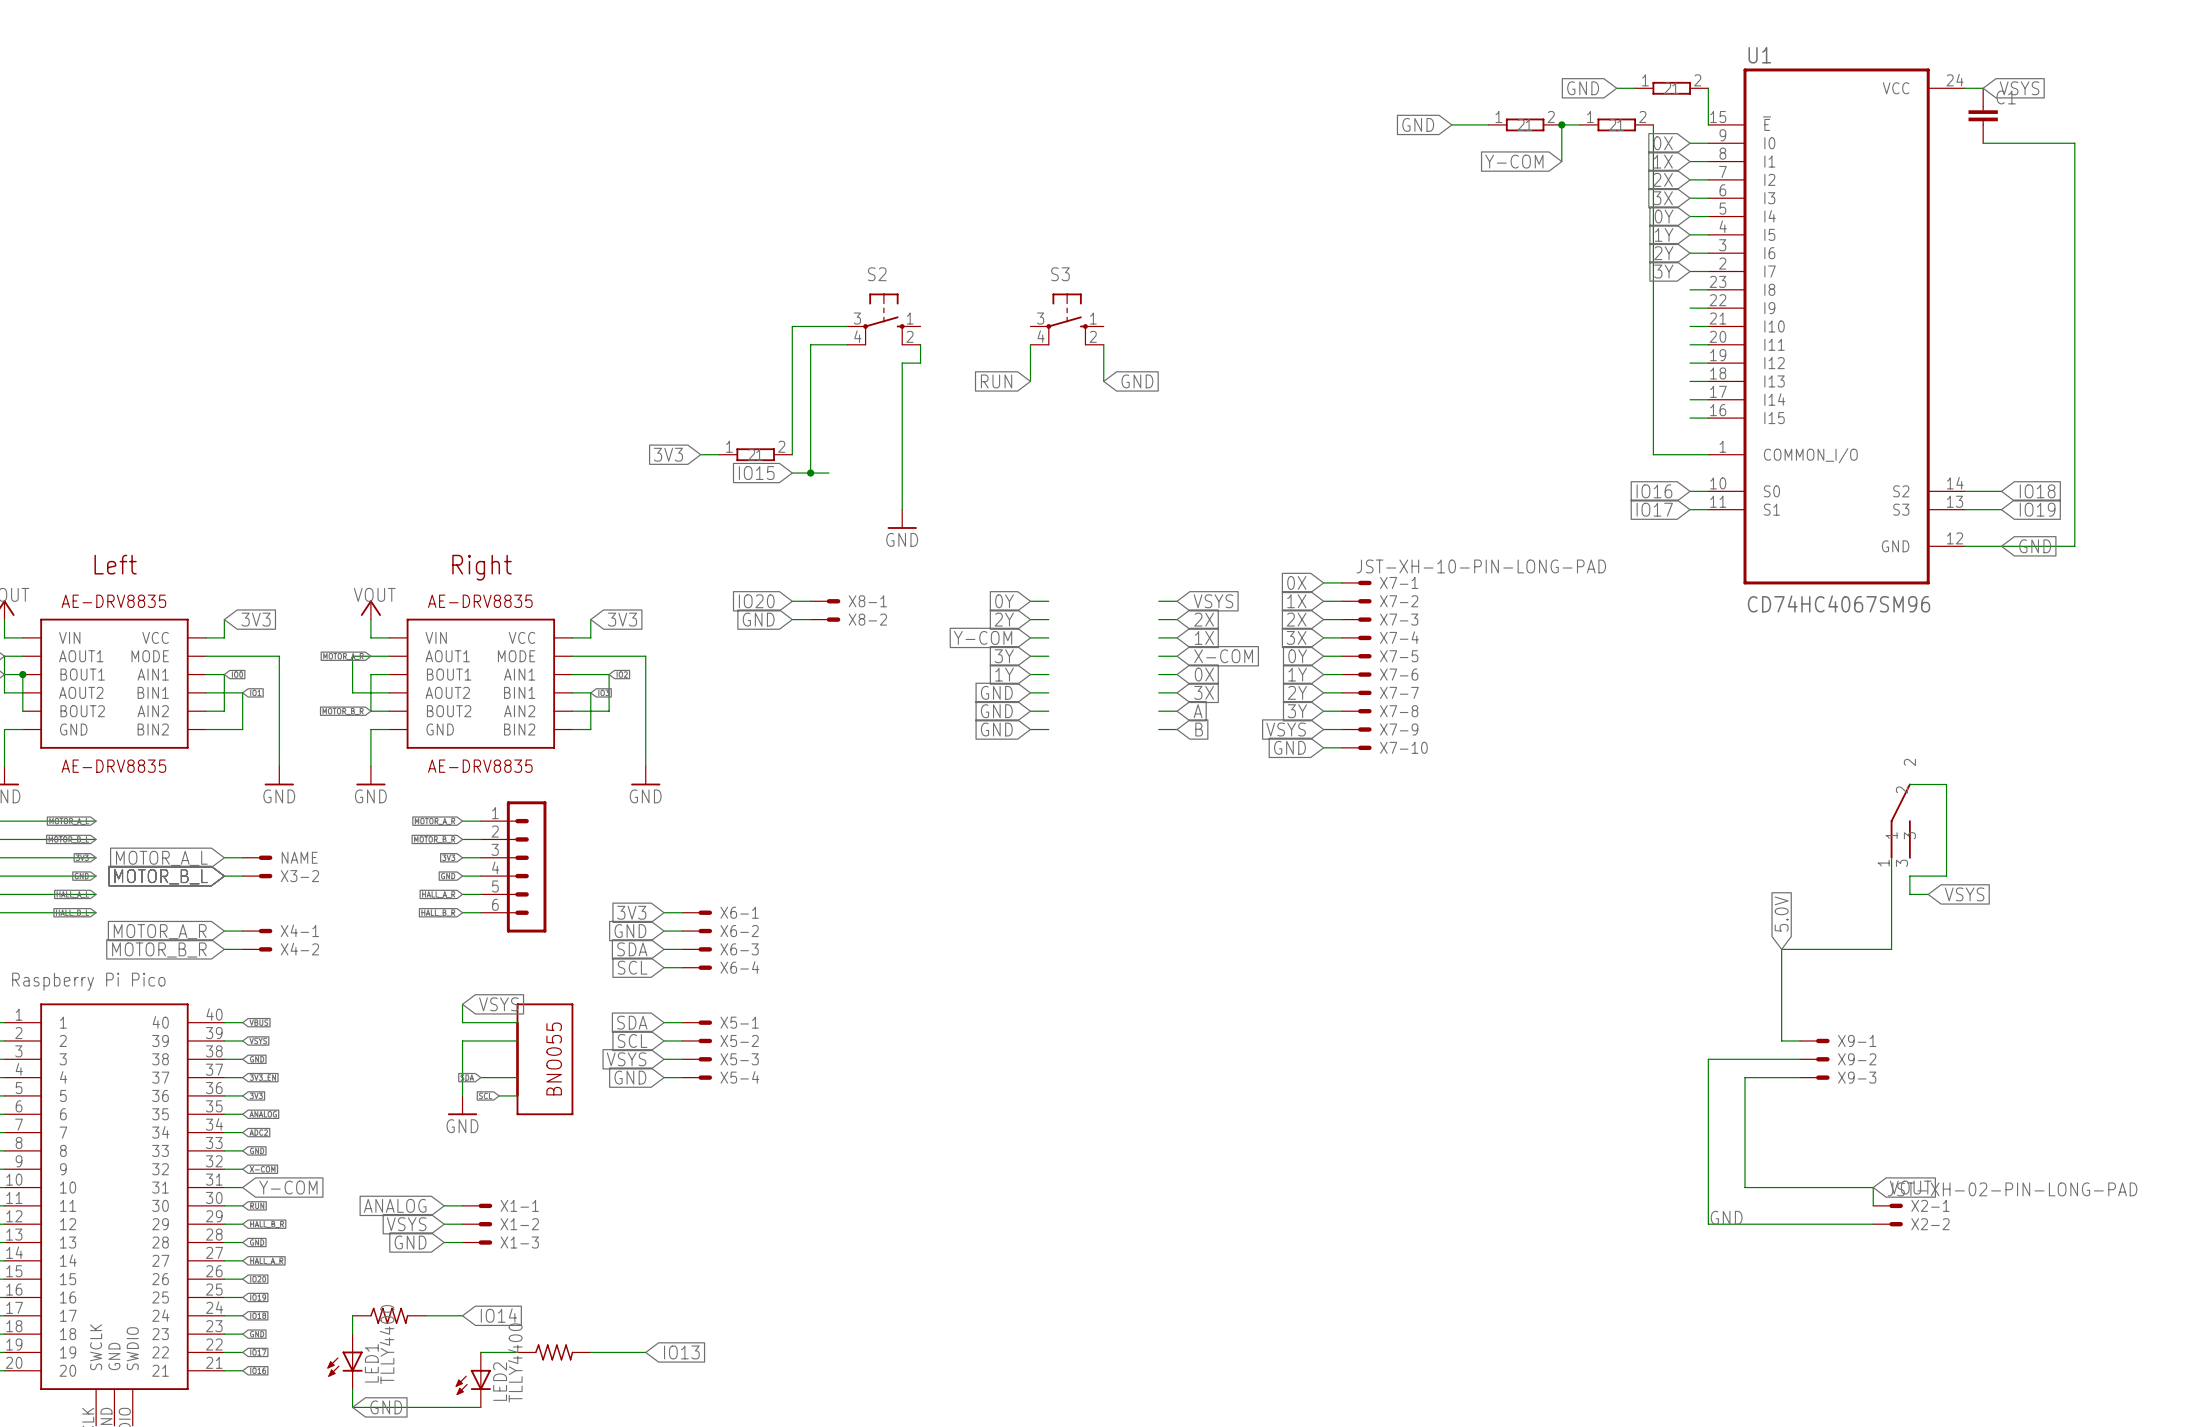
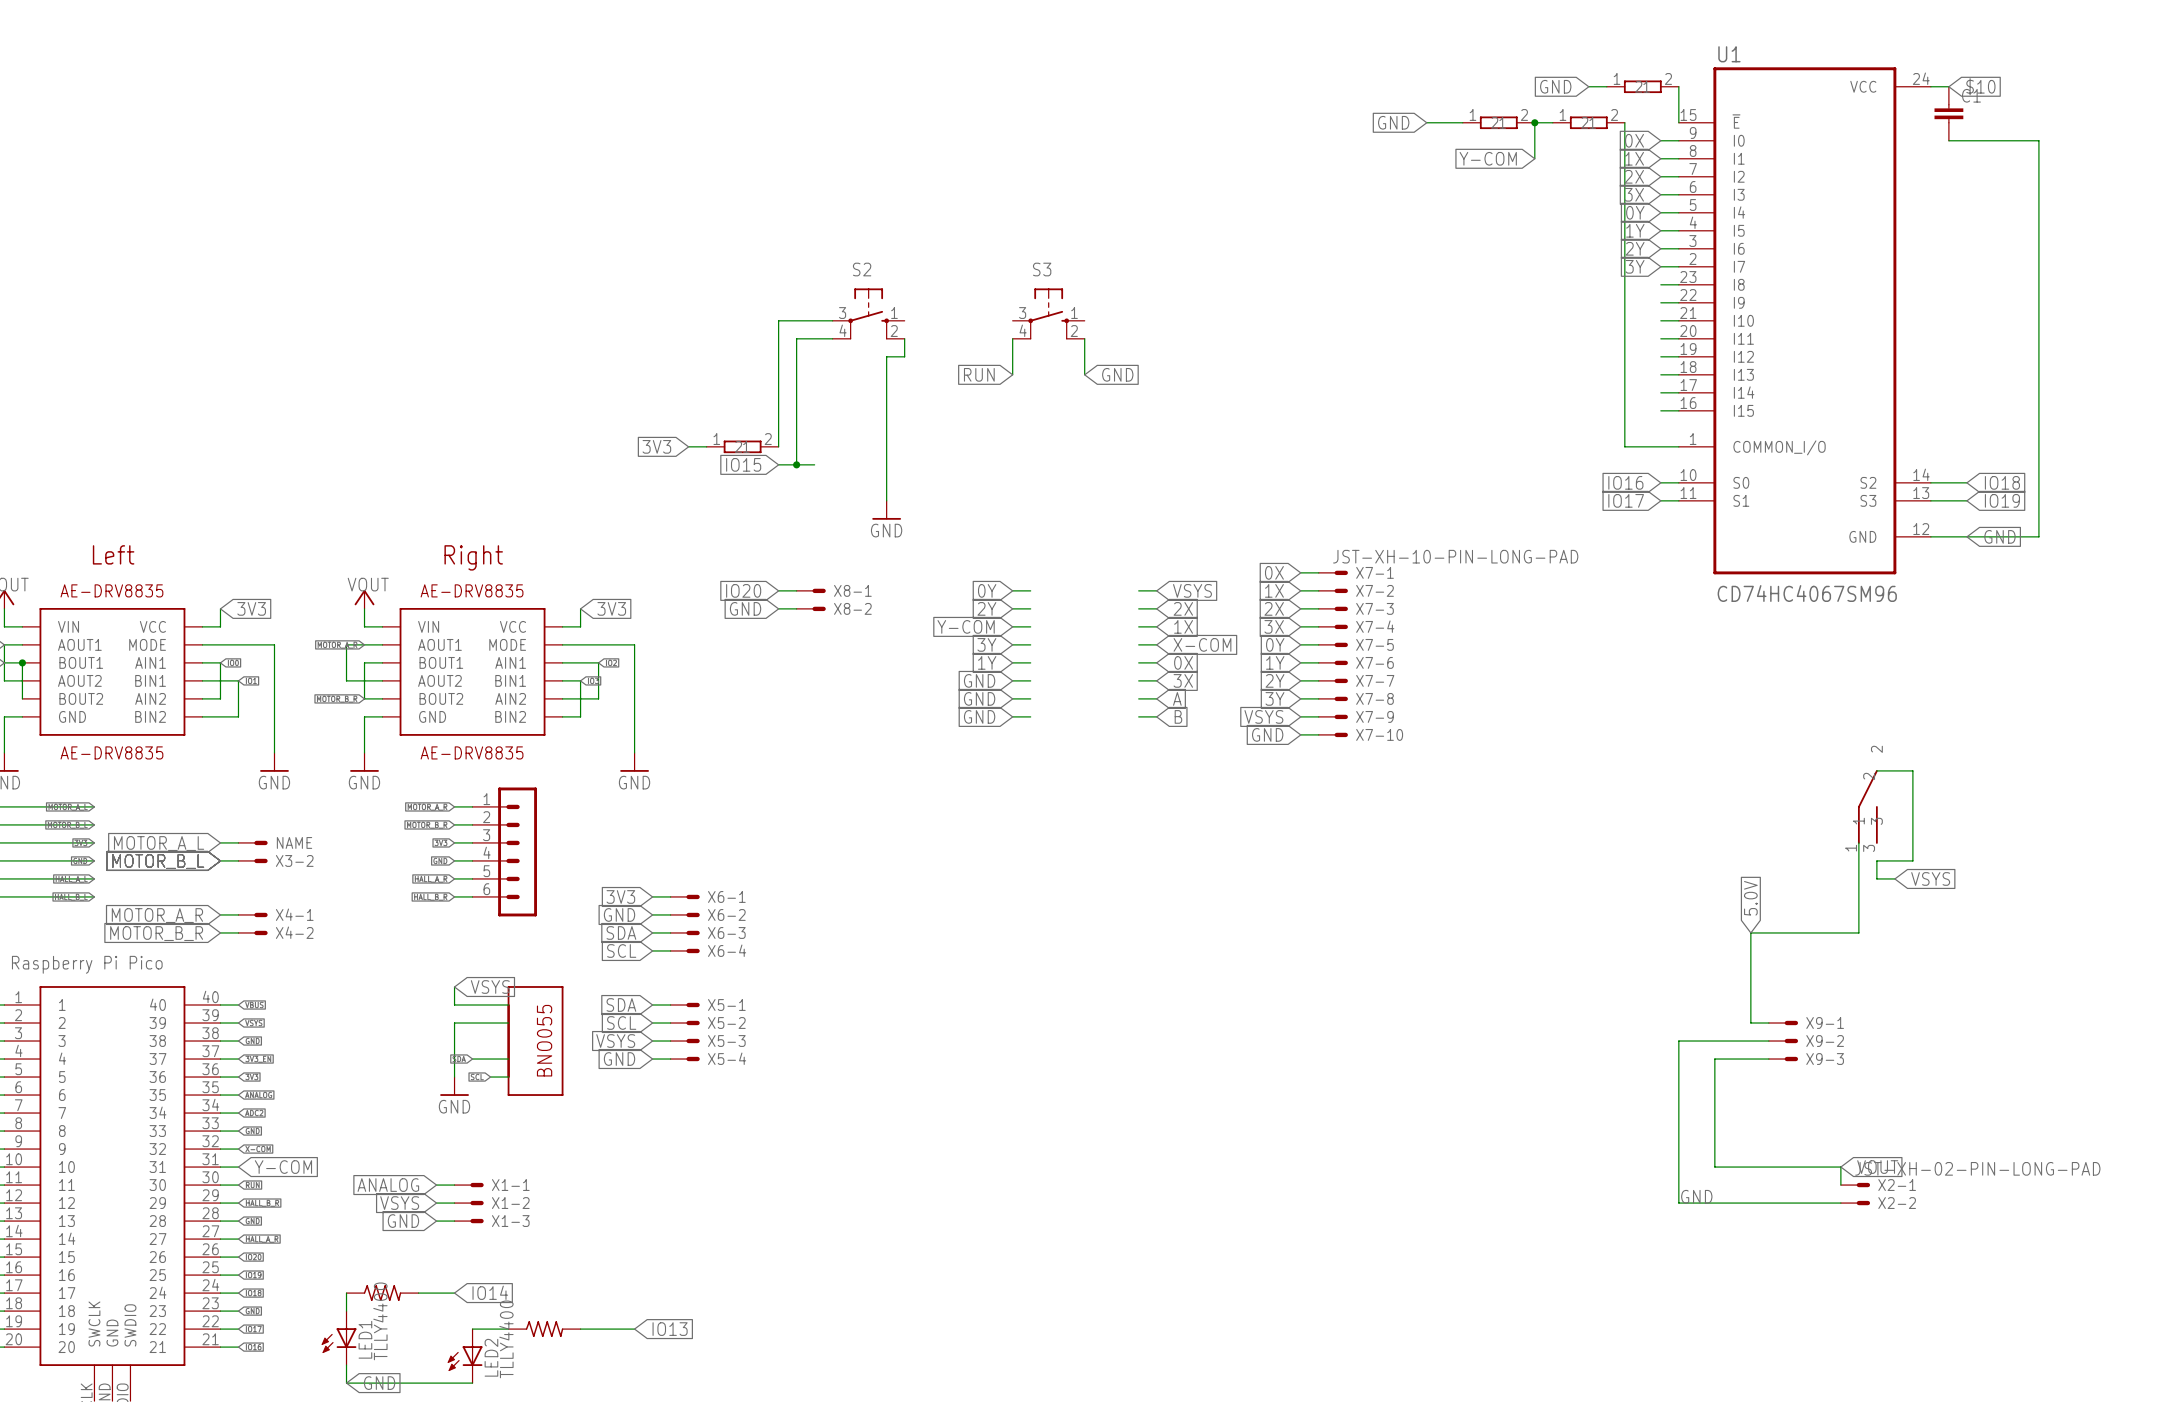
global label: VSYS (2019, 88) -> $10 (1980, 86)

